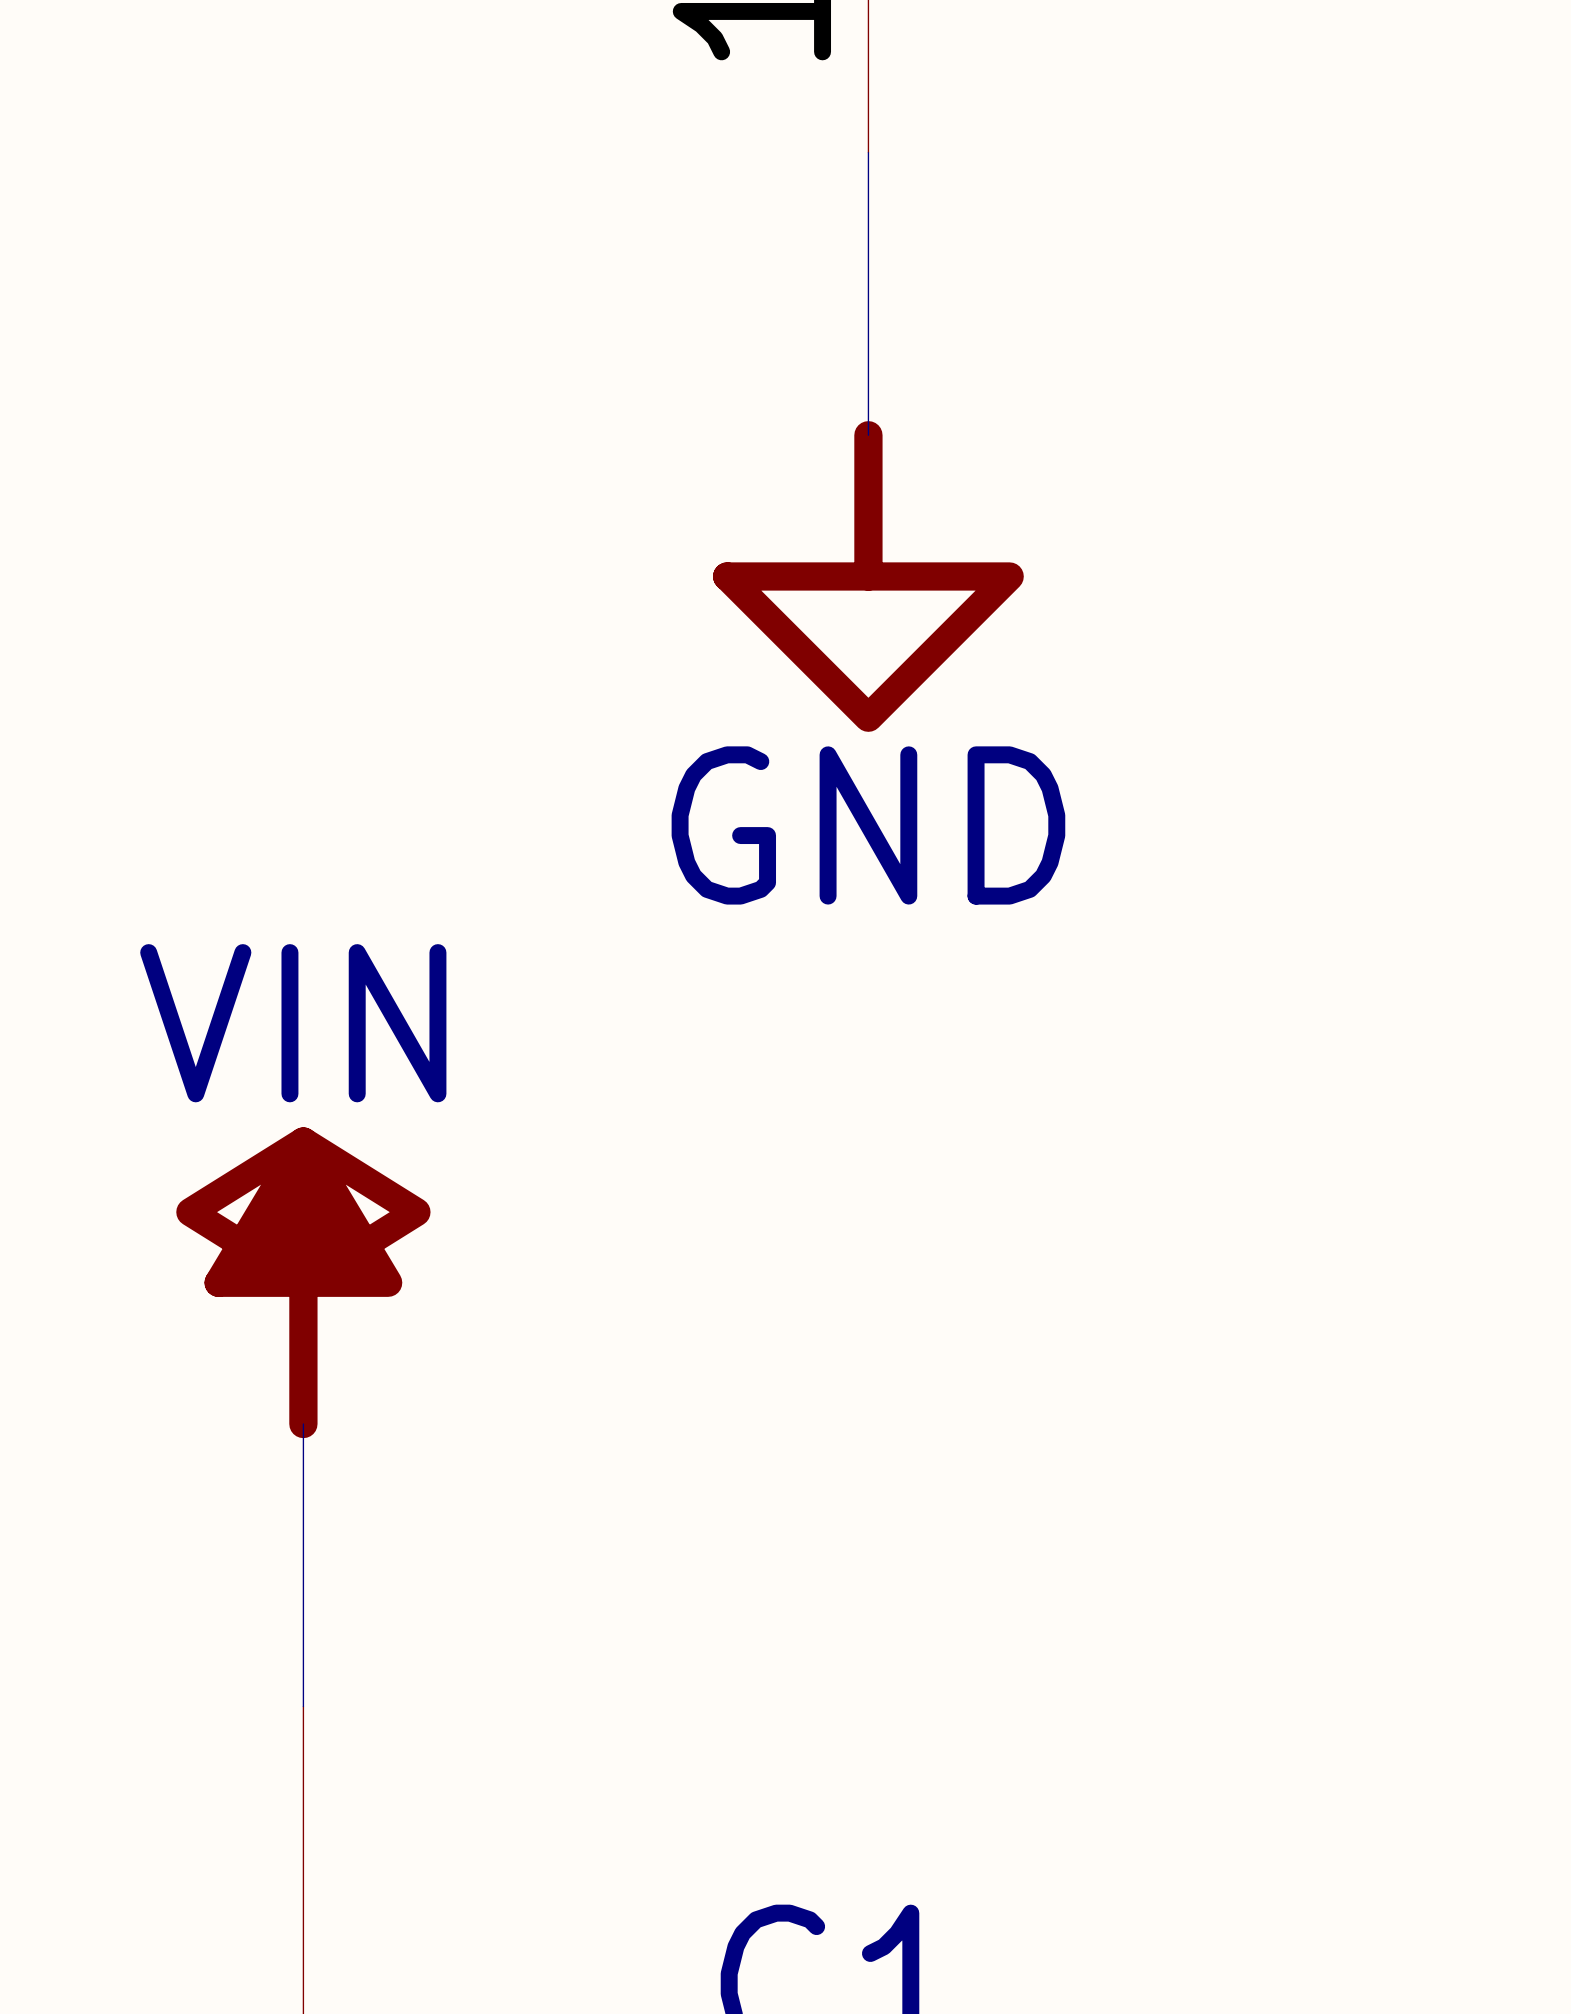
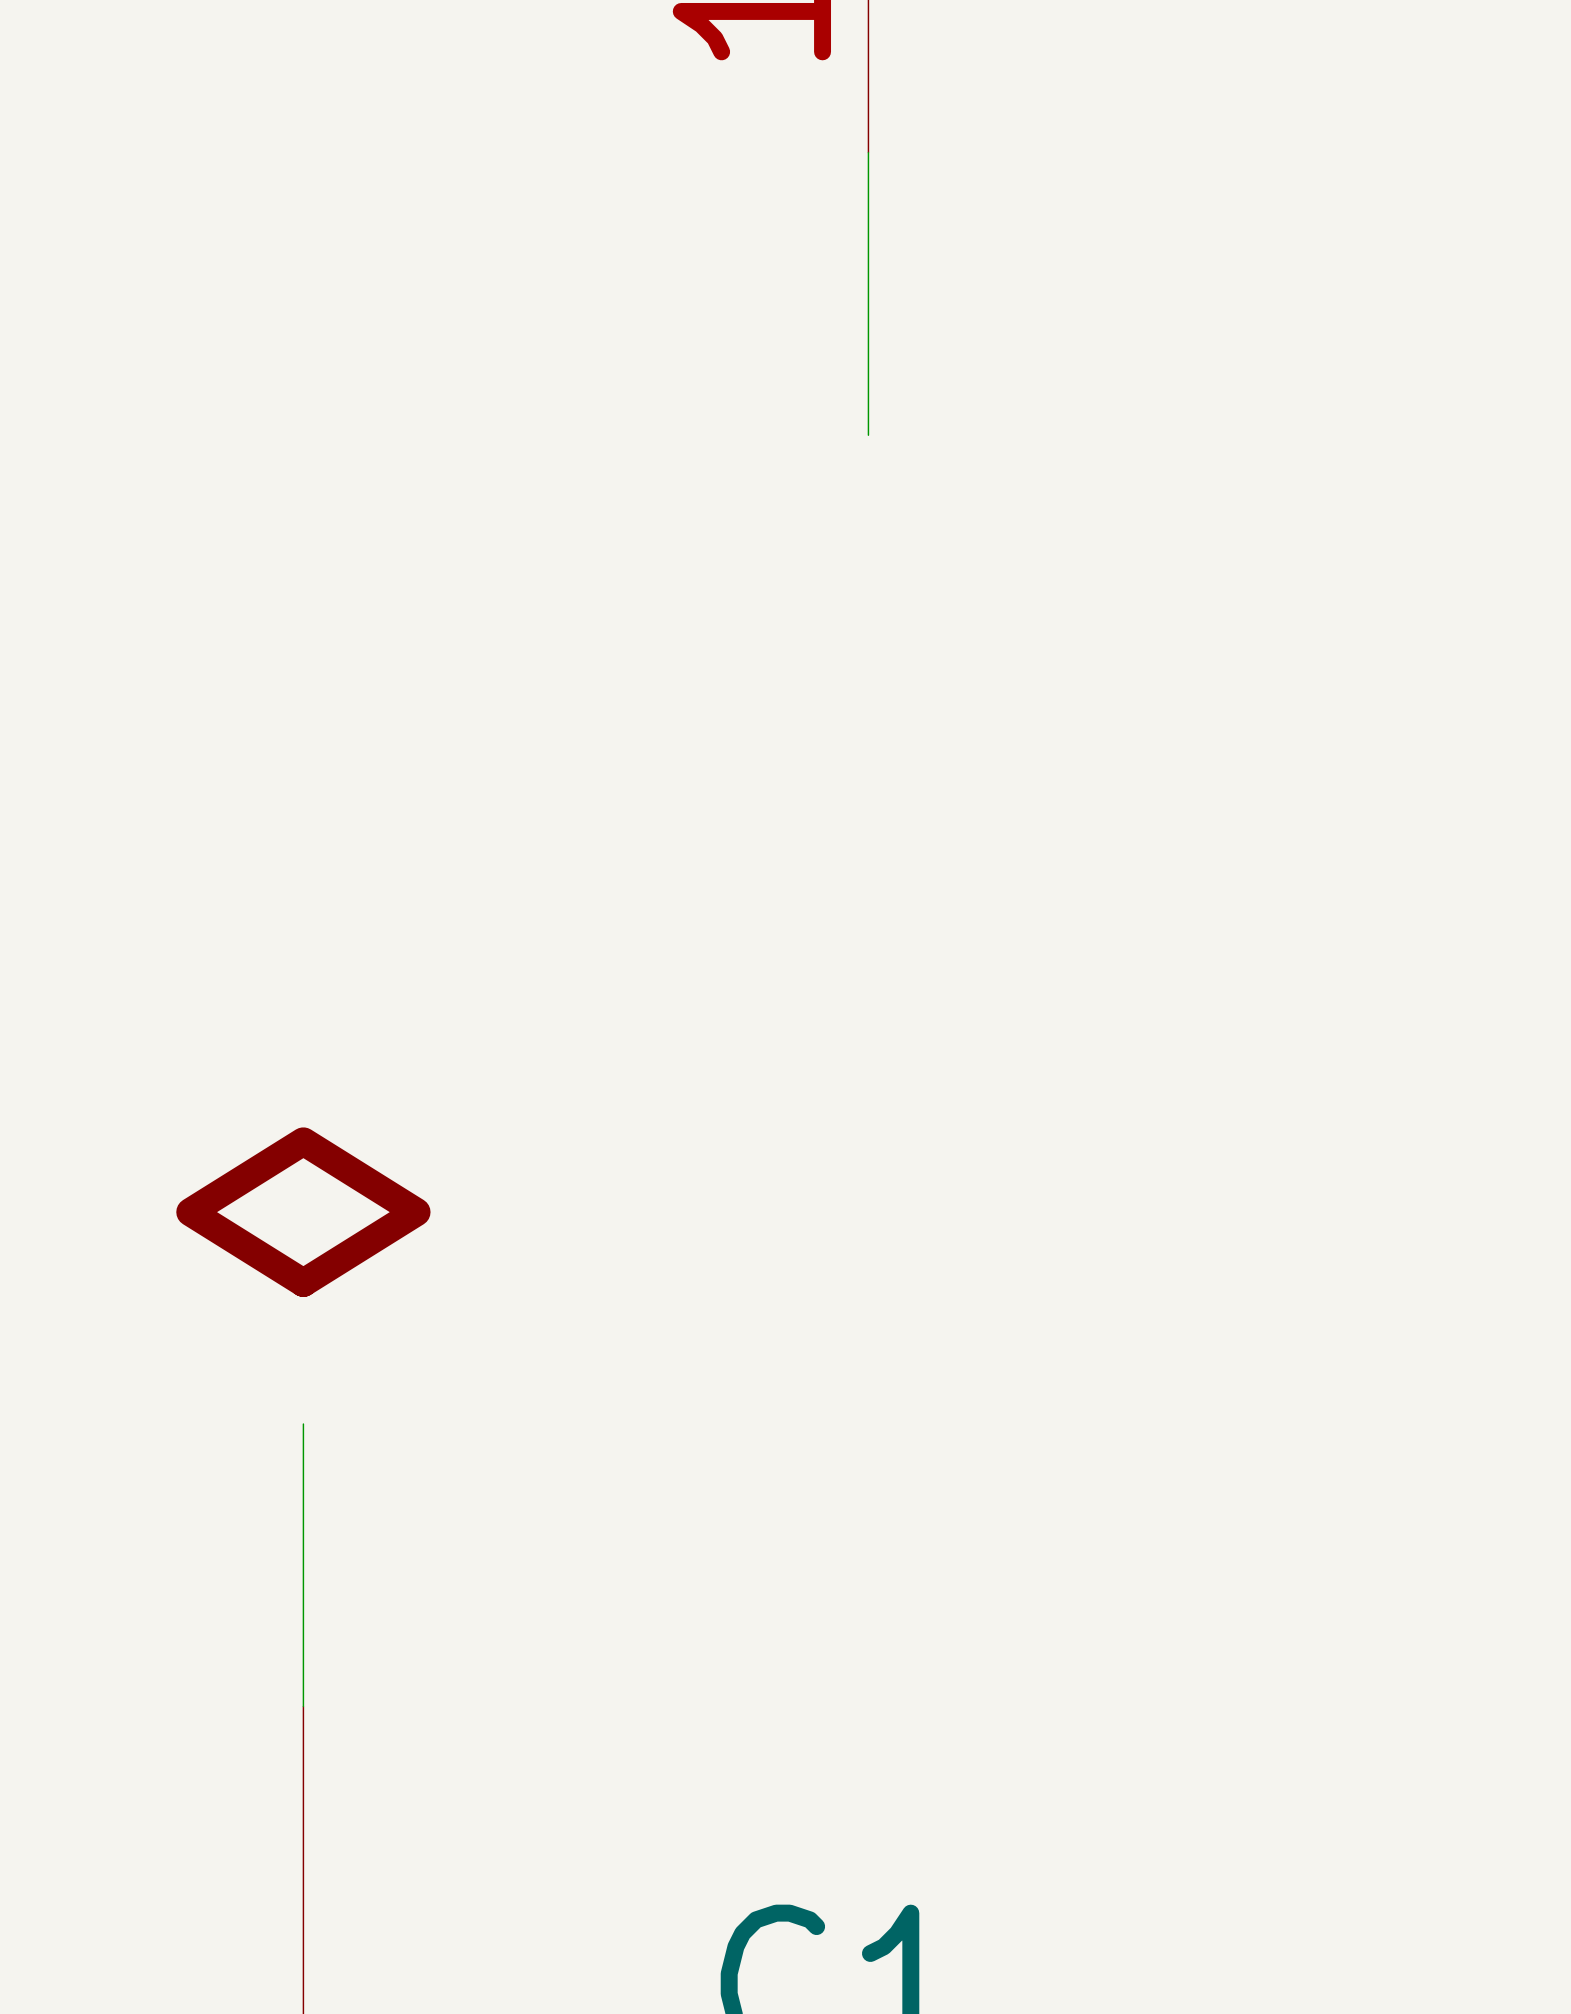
power symbol: GND (868, 576) -> none
power symbol: VIN (303, 1282) -> none

